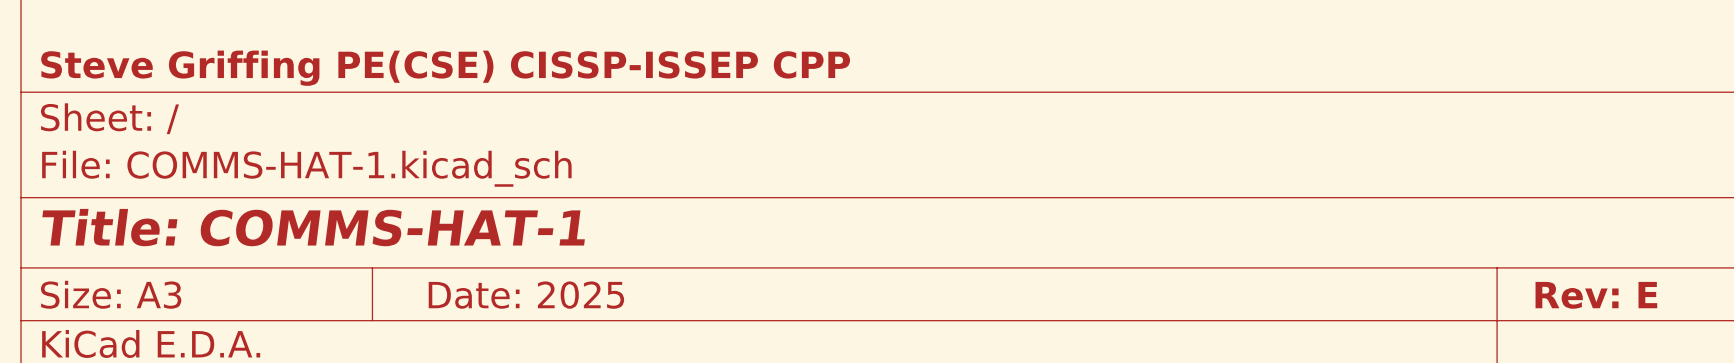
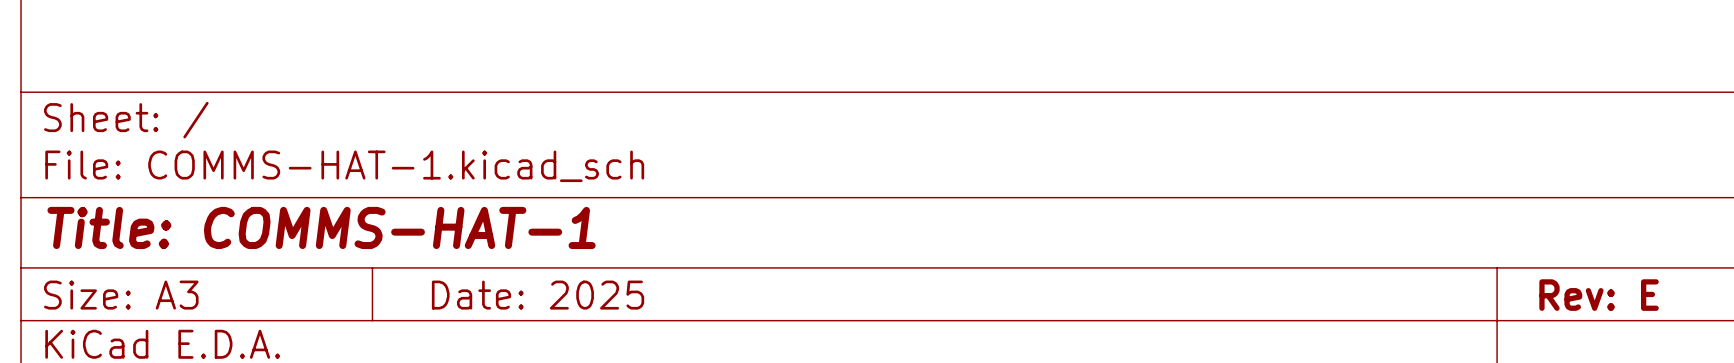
title block: Steve Griffing PE(CSE) CISSP-ISSEP CPP (445, 68) -> none

